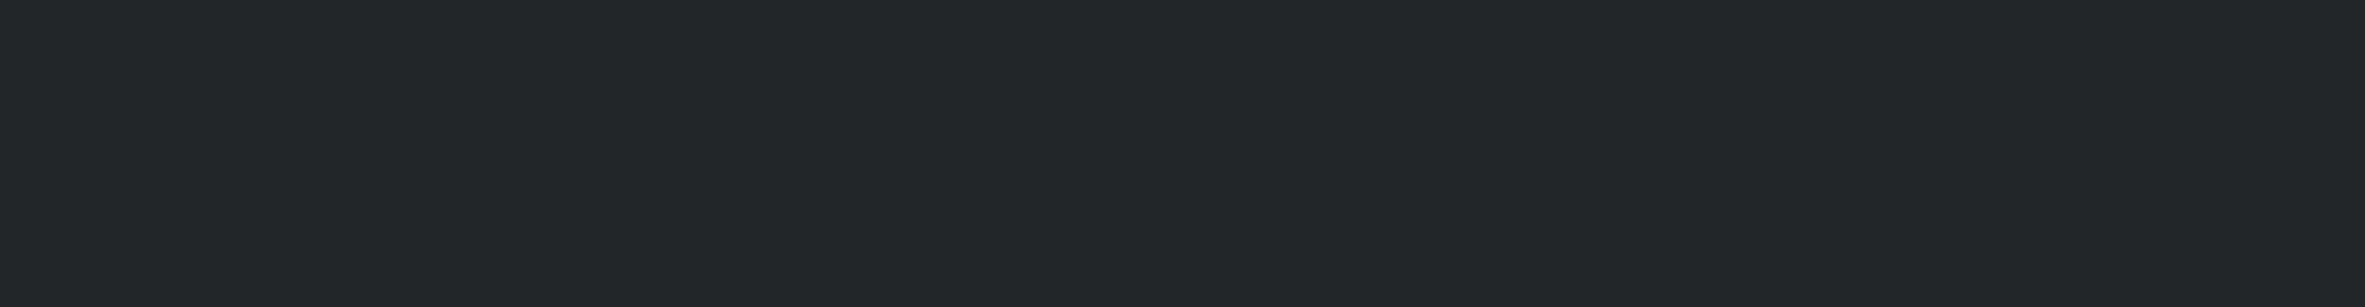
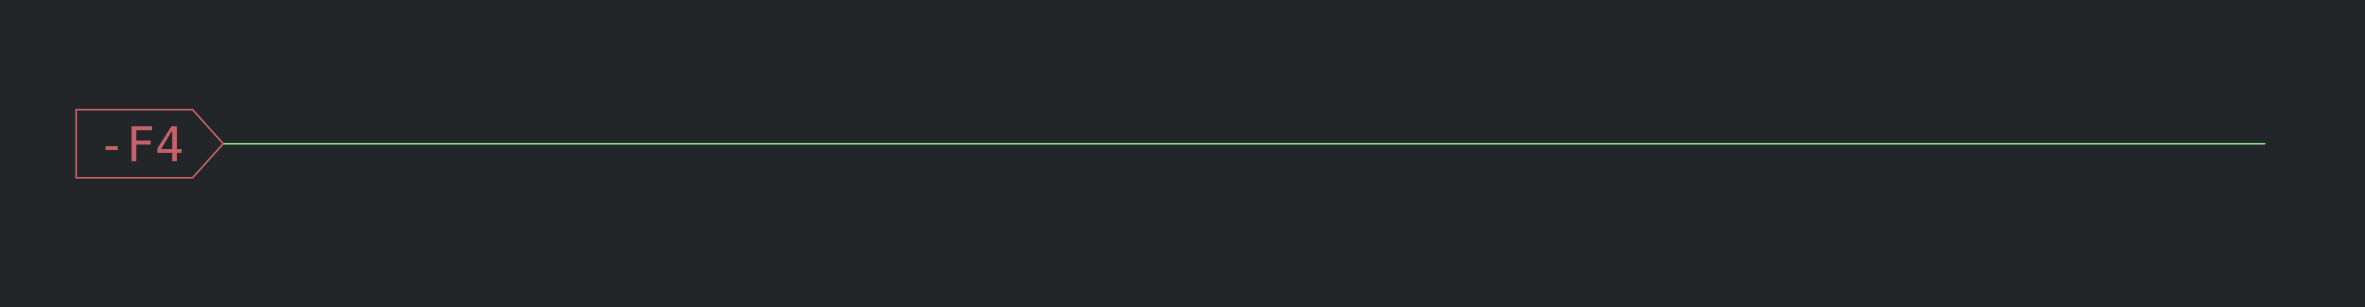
global label: none -> -F4 (143, 143)
wire: none -> (223, 143) (2264, 143)

